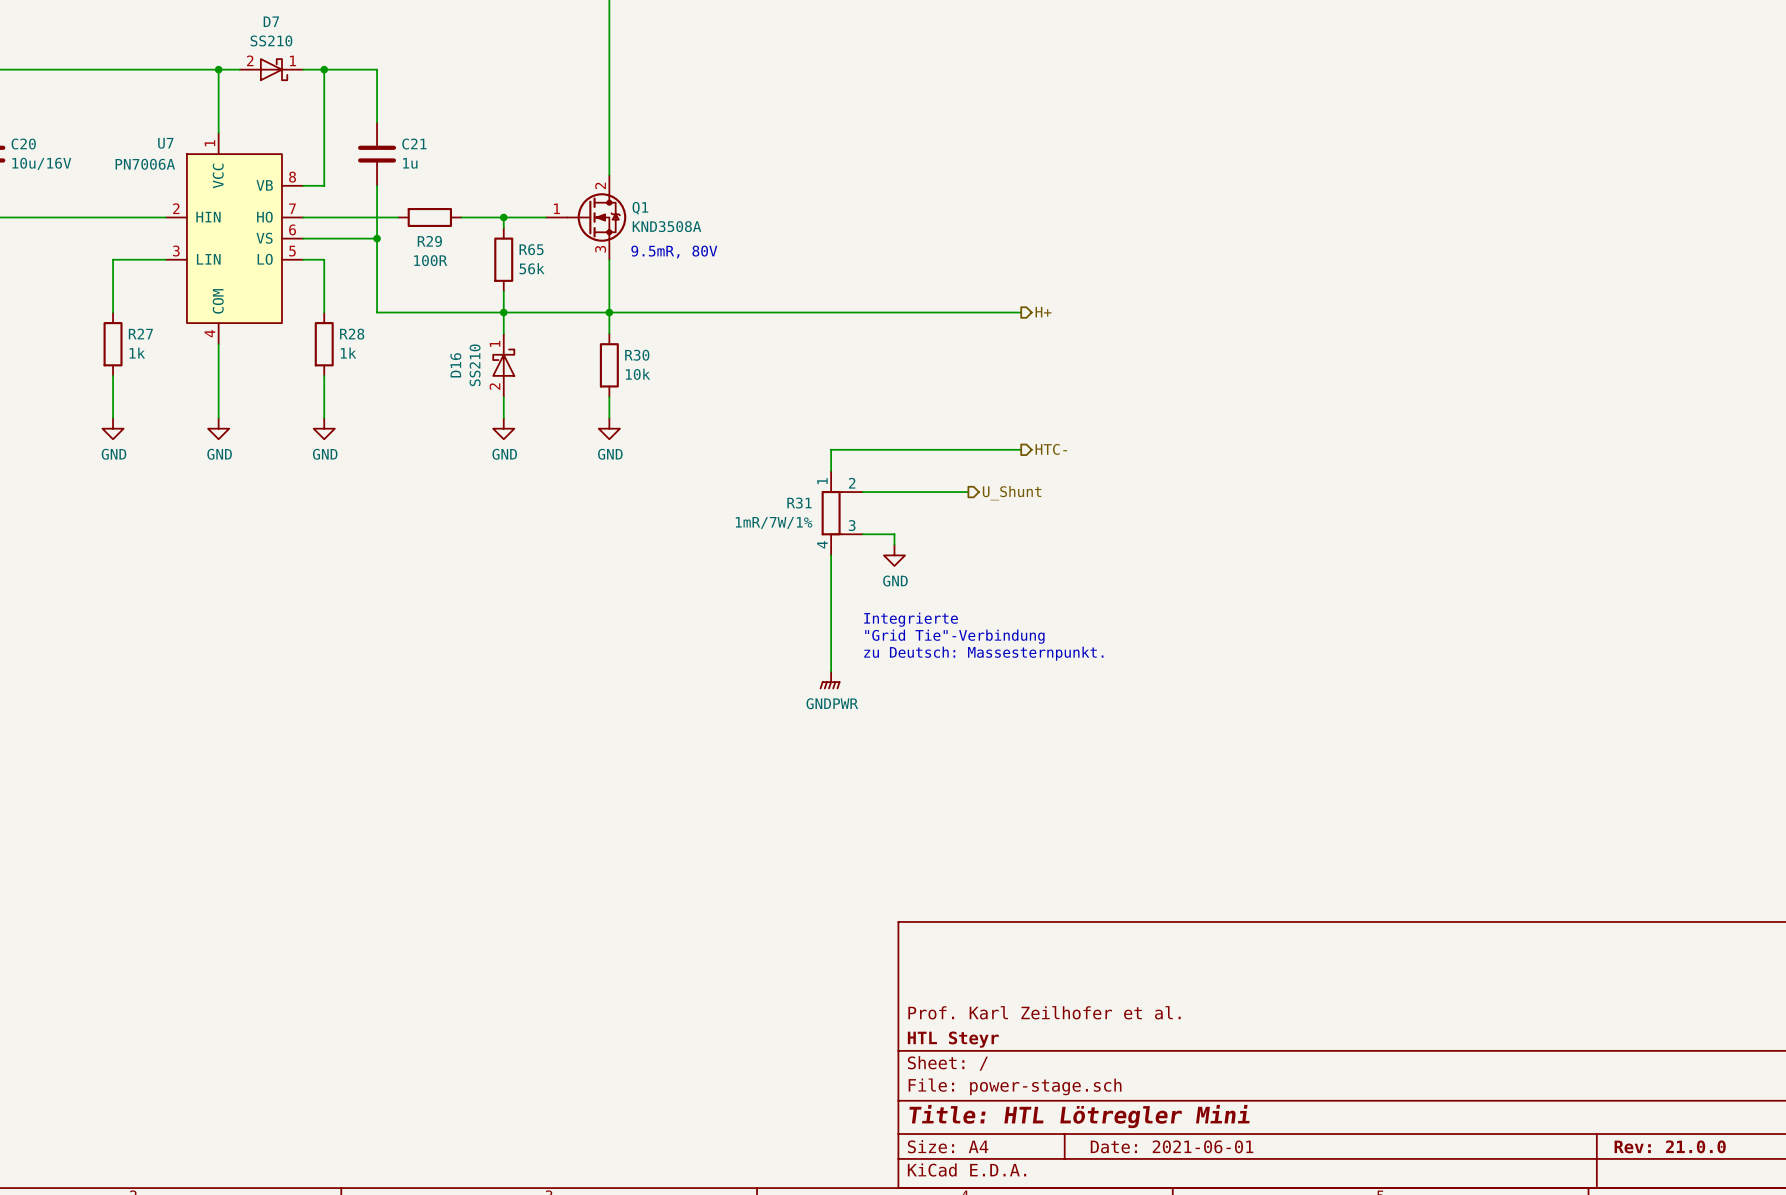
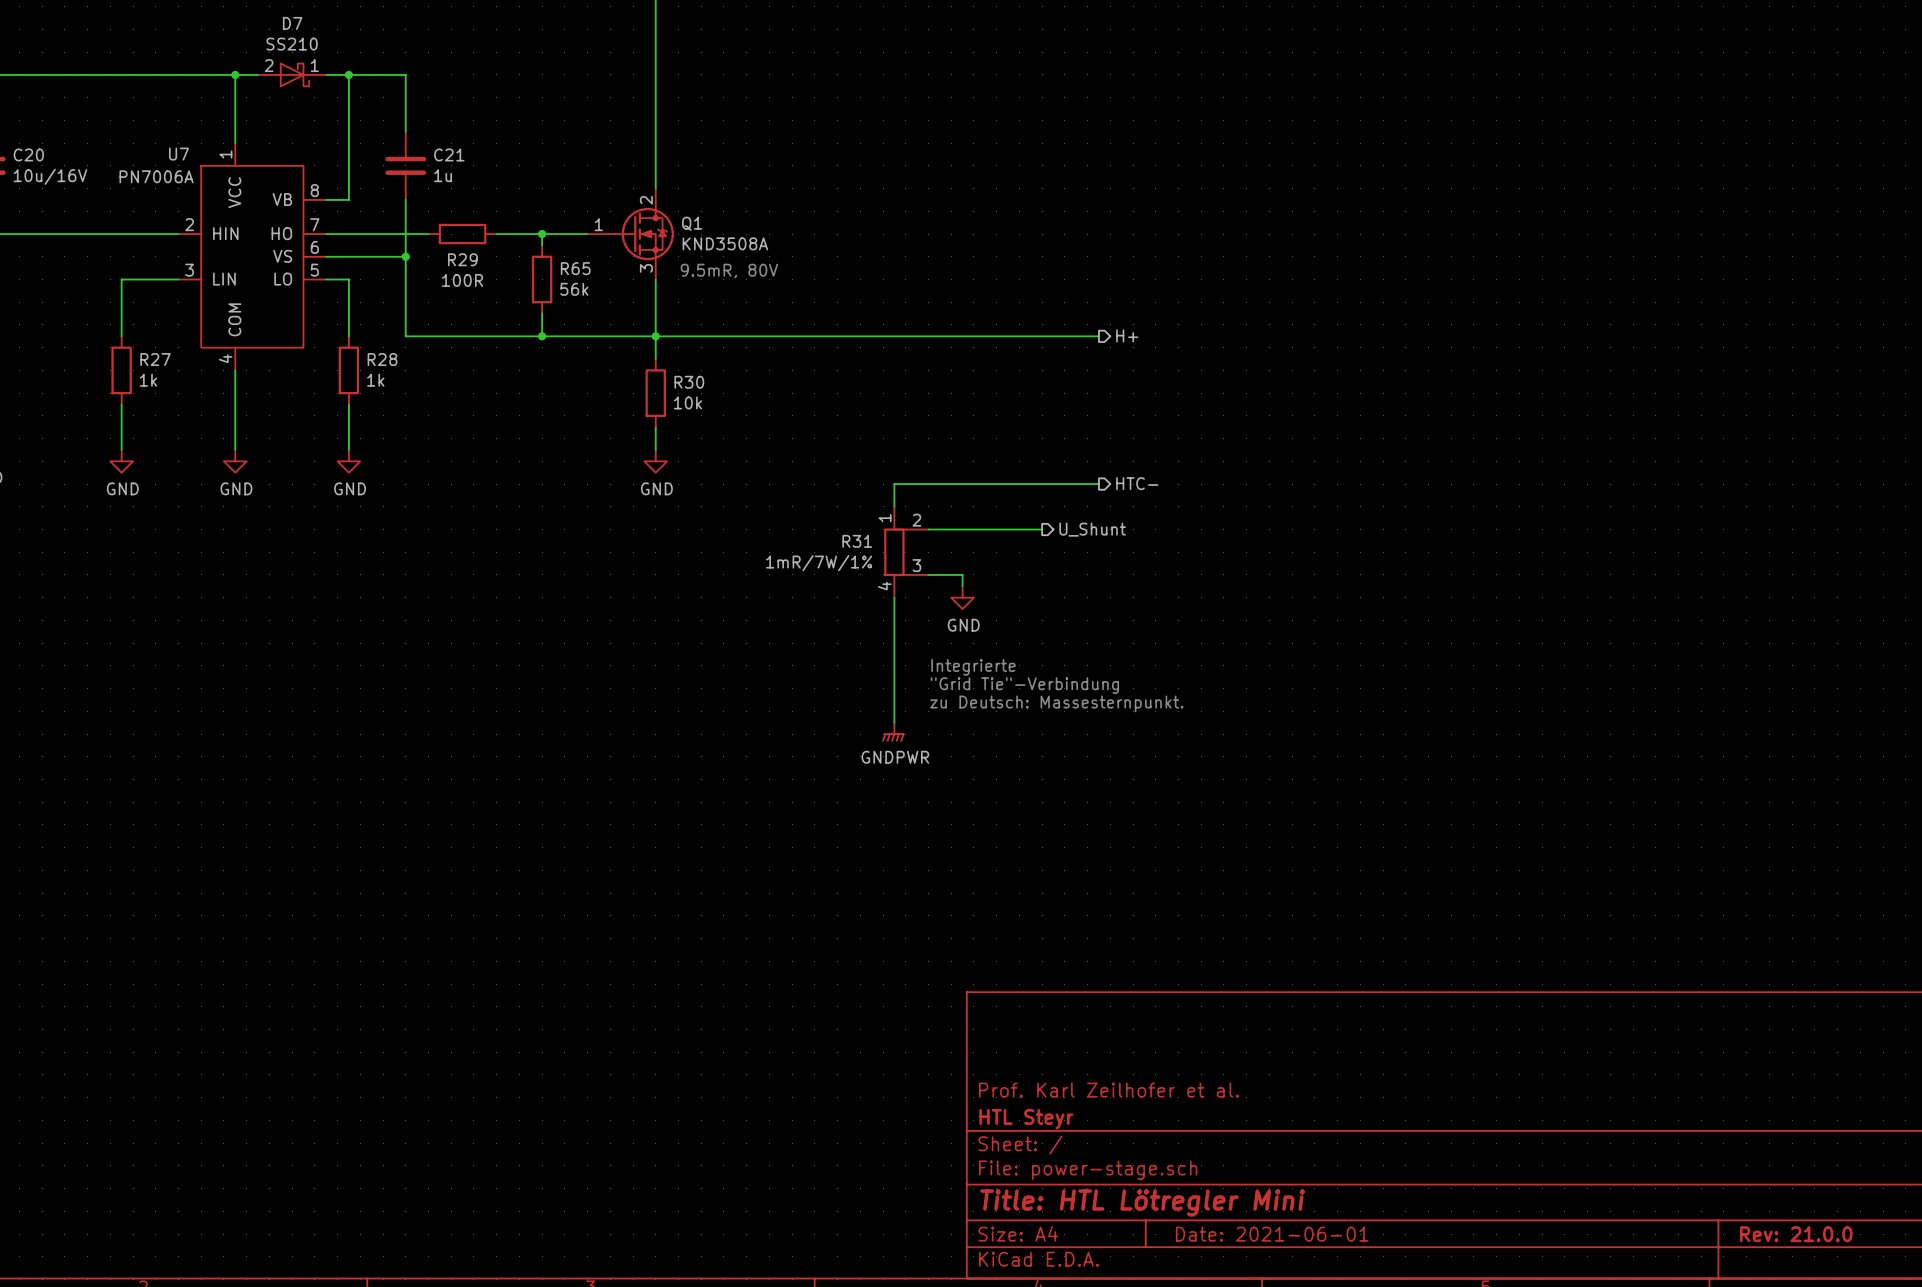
wire: (503, 312) (503, 333) -> none
D16: SS210 (503, 365) -> none
wire: (503, 397) (503, 418) -> none
power symbol: GND (503, 428) -> none

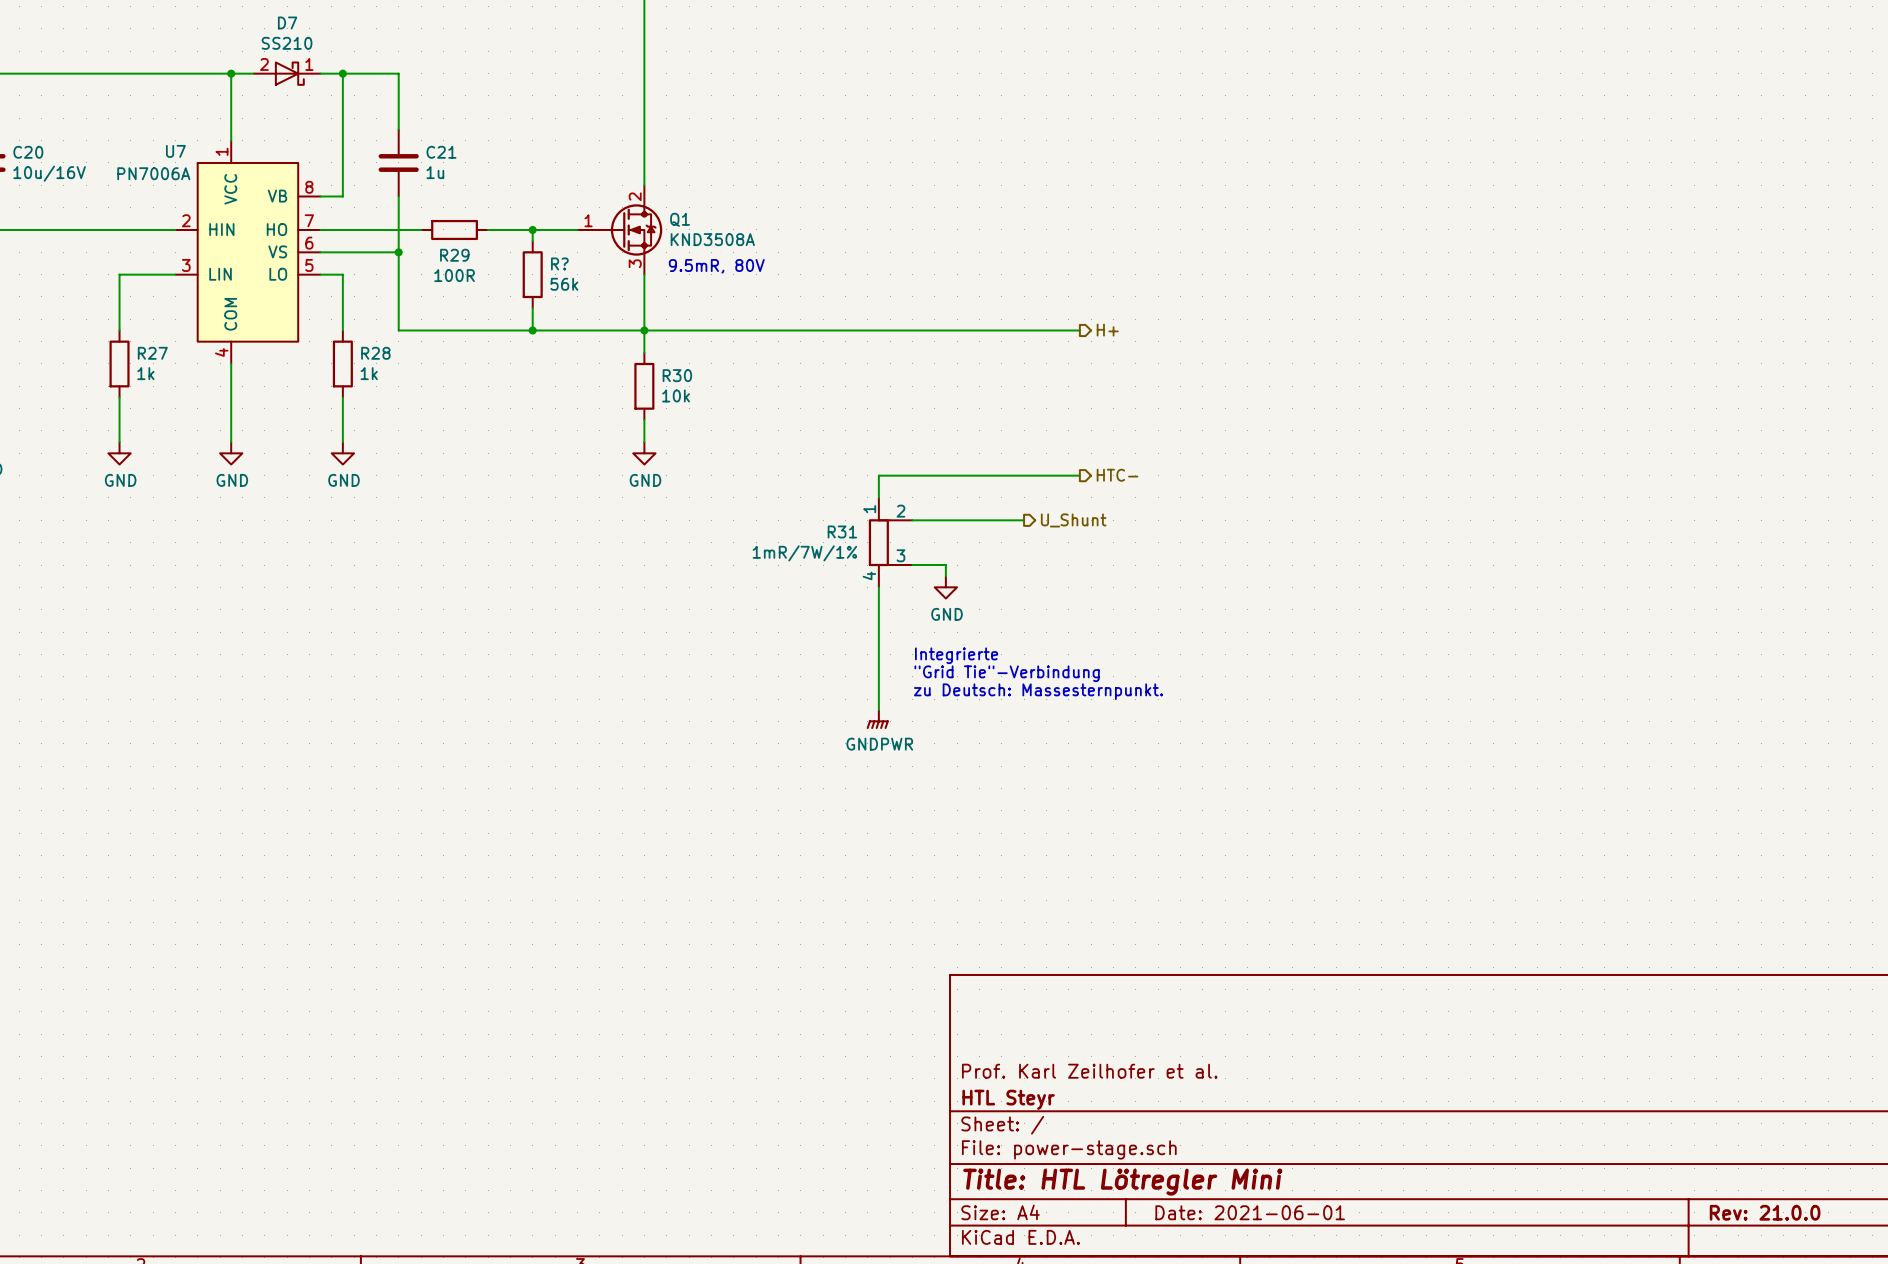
R65 name: R65 (575, 268) -> R? (559, 263)

